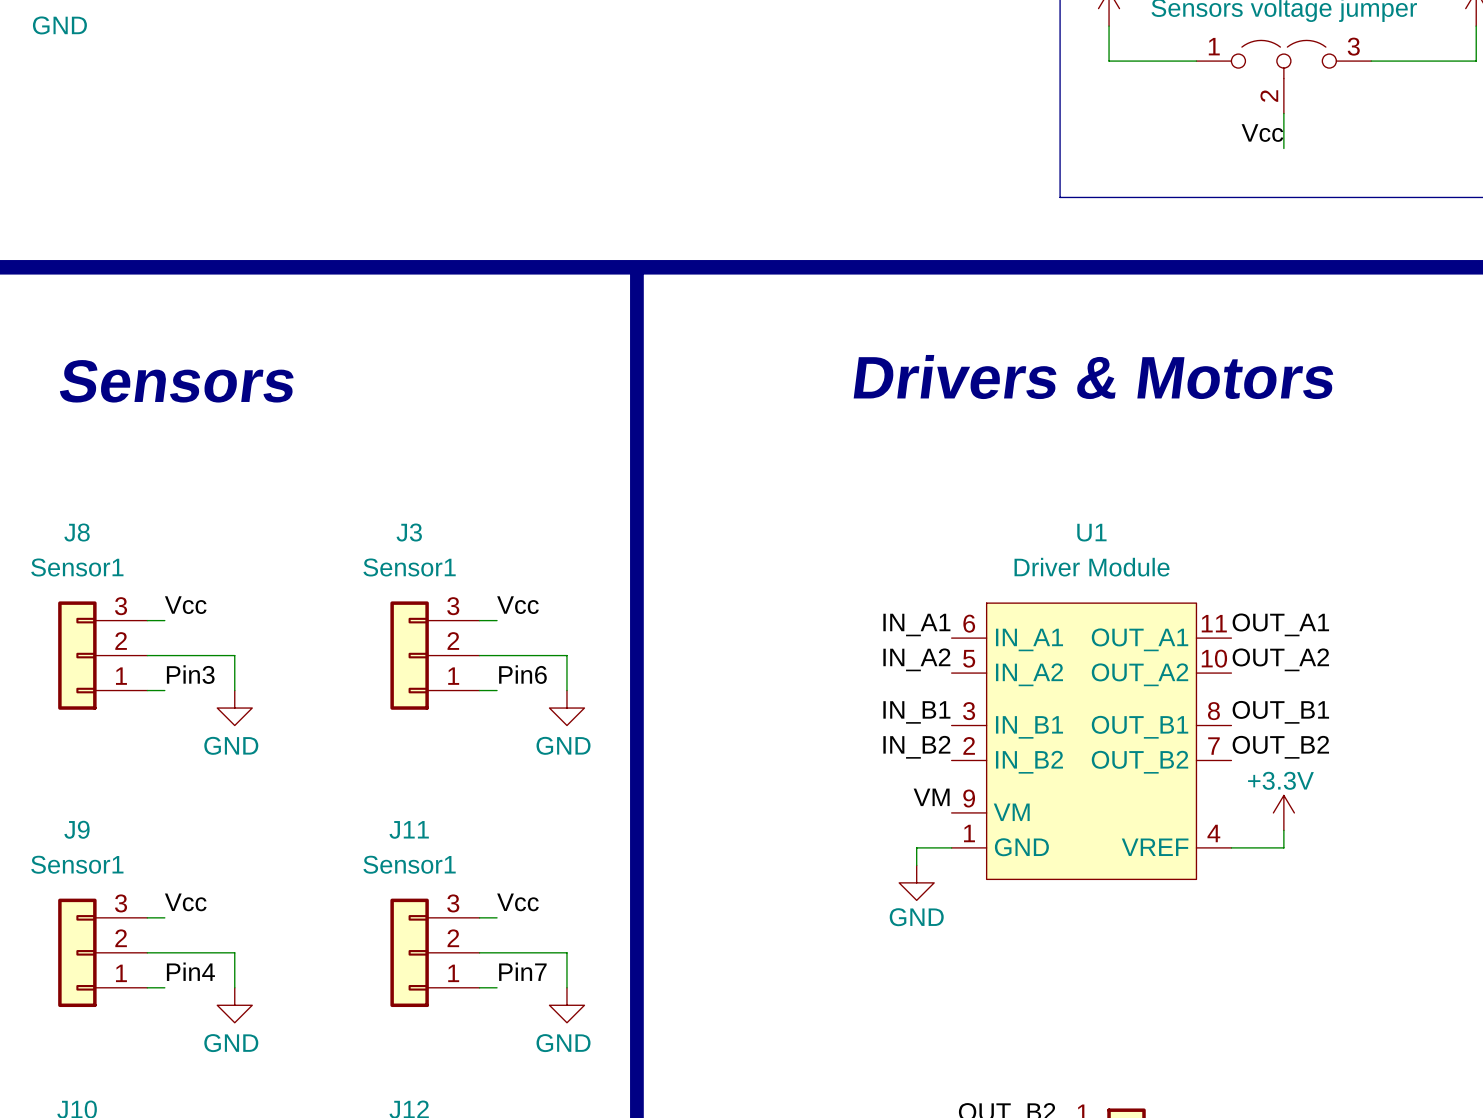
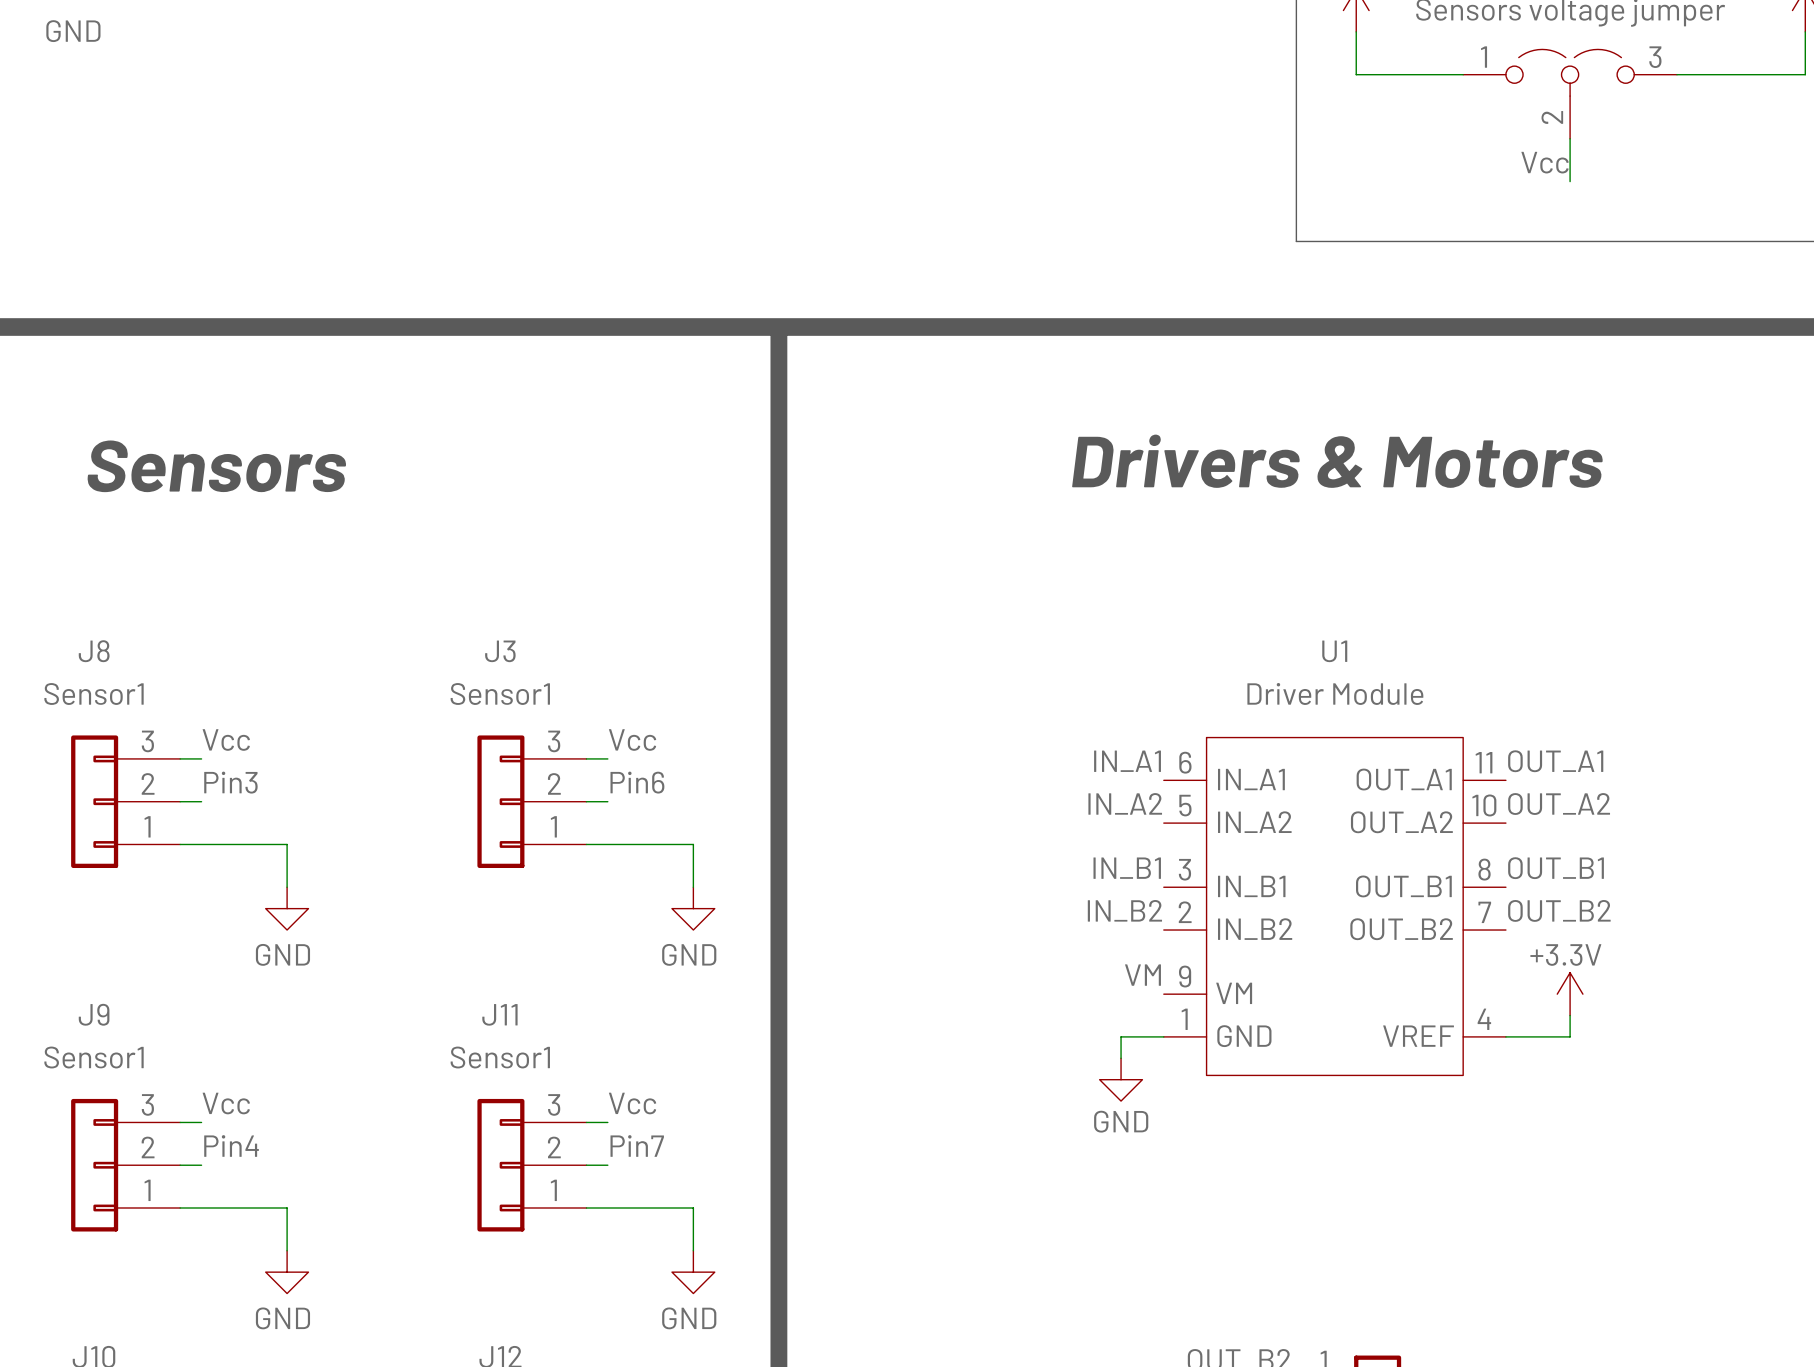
wire: (164, 655) (234, 655) (234, 690) -> (201, 844) (287, 844) (287, 887)
wire: (497, 655) (566, 655) (566, 690) -> (607, 844) (693, 844) (693, 887)
label position: Pin3 (190, 674) -> Pin3 (230, 782)
label position: Pin6 (522, 674) -> Pin6 (637, 782)
power symbol position: GND (234, 708) -> GND (287, 908)
power symbol position: GND (566, 708) -> GND (693, 908)
wire: (164, 952) (234, 952) (234, 987) -> (201, 1207) (287, 1207) (287, 1250)
wire: (497, 952) (566, 952) (566, 987) -> (607, 1207) (693, 1207) (693, 1250)
label position: Pin4 (190, 971) -> Pin4 (231, 1145)
label position: Pin7 (522, 971) -> Pin7 (637, 1145)
power symbol position: GND (234, 1005) -> GND (287, 1272)
power symbol position: GND (566, 1005) -> GND (693, 1272)

